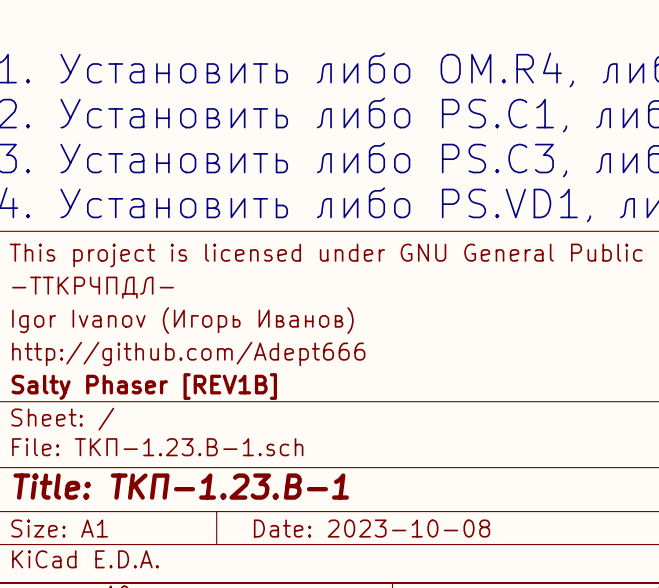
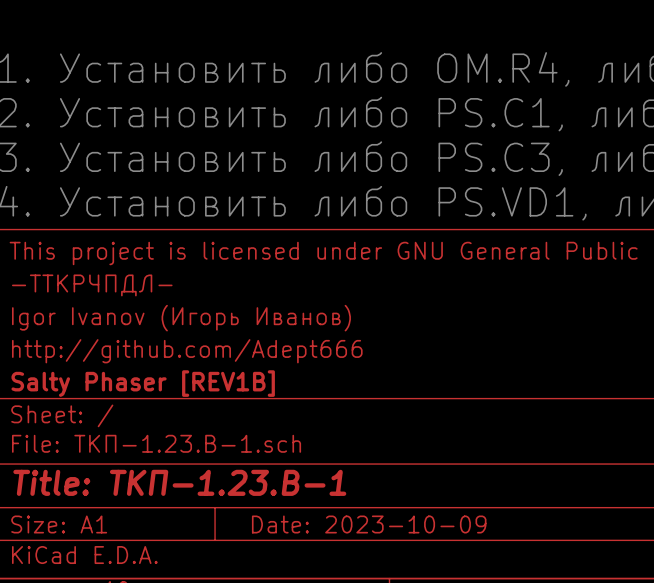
title block: Date: 2023-10-08 (372, 528) -> Date: 2023-10-09 (369, 524)

